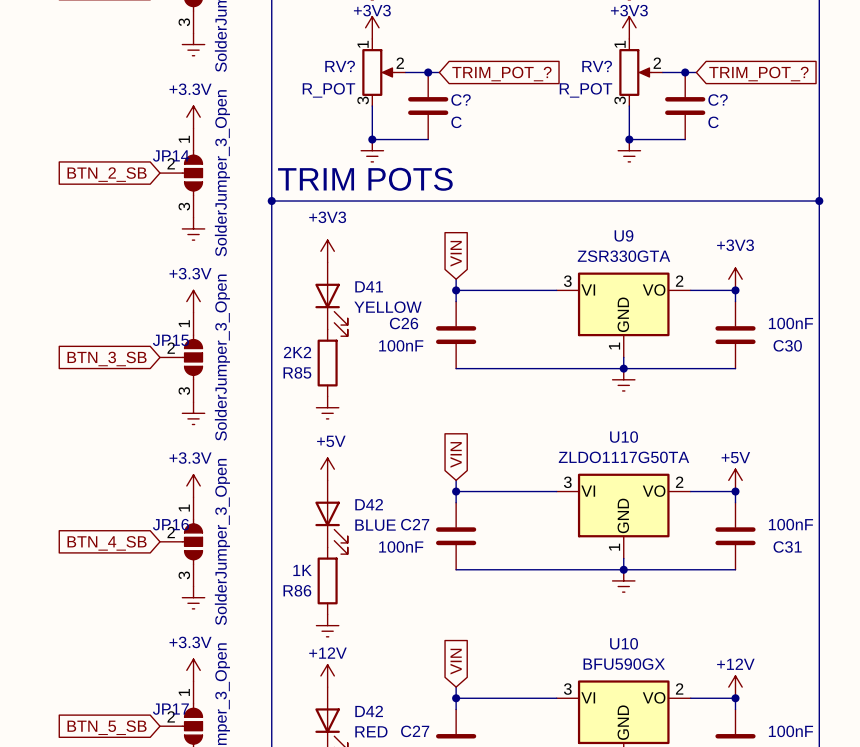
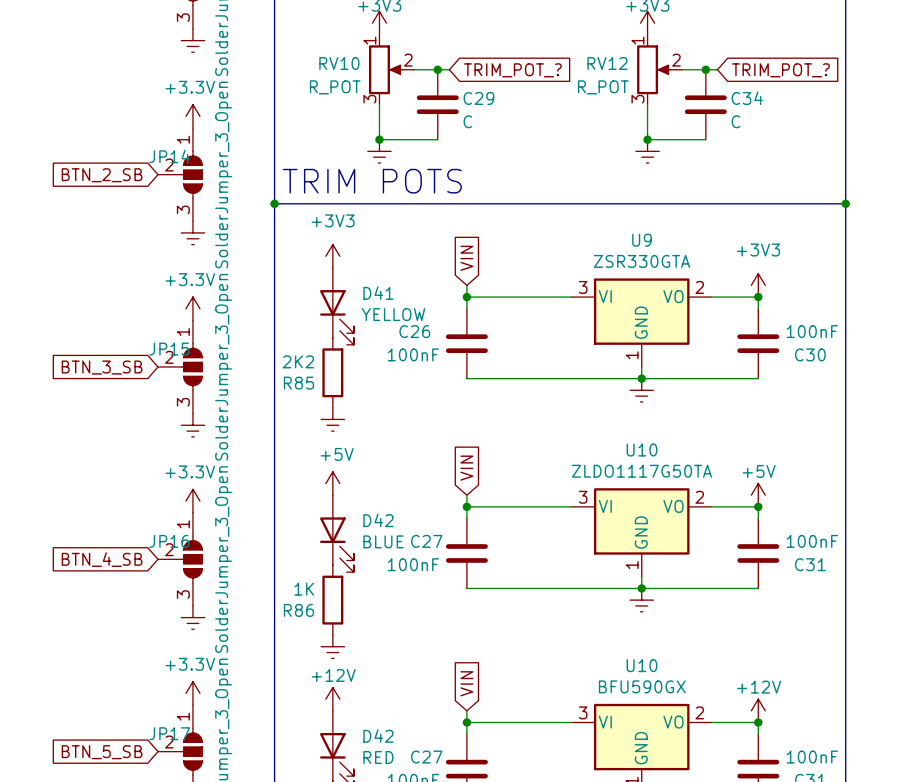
RV? name: RV? (340, 66) -> RV10 (339, 63)
RV? name: RV? (597, 66) -> RV12 (607, 63)
C? name: C? (461, 100) -> C29 (478, 98)
C? name: C? (718, 100) -> C34 (747, 98)

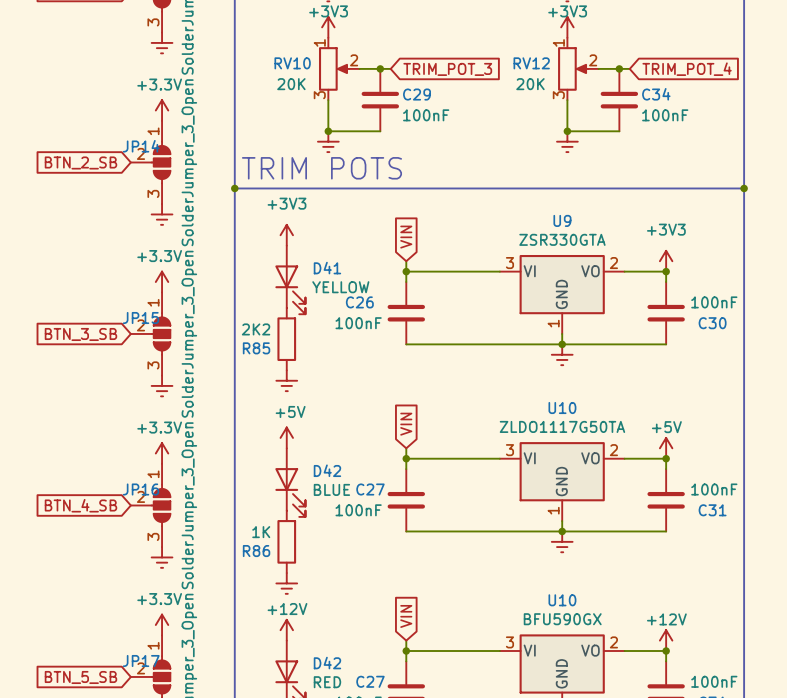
global label: TRIM_POT_? (512, 70) -> TRIM_POT_3 (447, 69)
global label: TRIM_POT_? (780, 70) -> TRIM_POT_4 (687, 69)
RV10 value: R_POT (335, 87) -> 20K (291, 84)
RV12 value: R_POT (603, 87) -> 20K (530, 84)
C29 value: C (467, 121) -> 100nF (426, 115)
C34 value: C (735, 121) -> 100nF (665, 115)

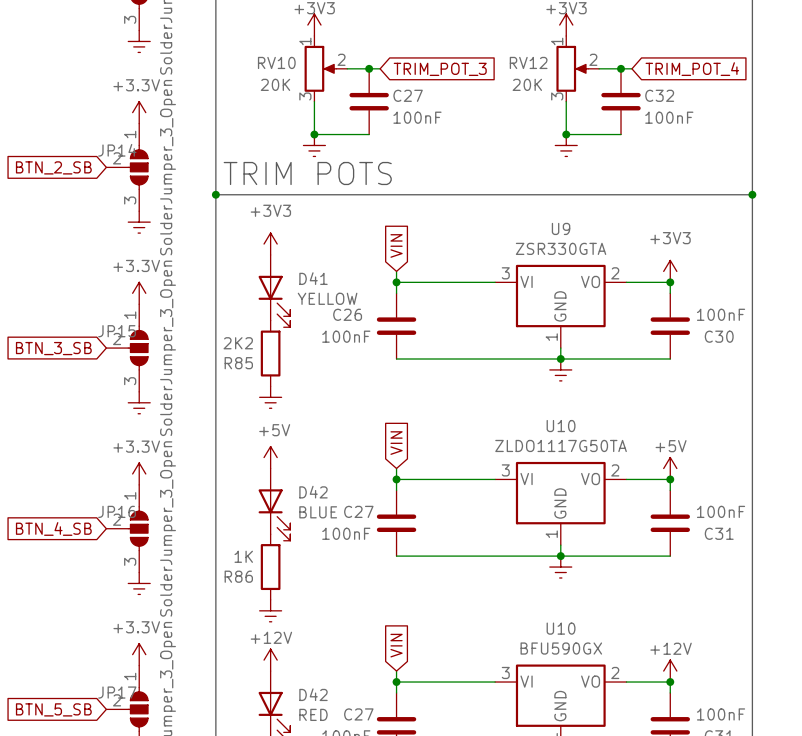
C29 name: C29 (417, 94) -> C27 (408, 95)
C34 name: C34 (656, 94) -> C32 (659, 95)

